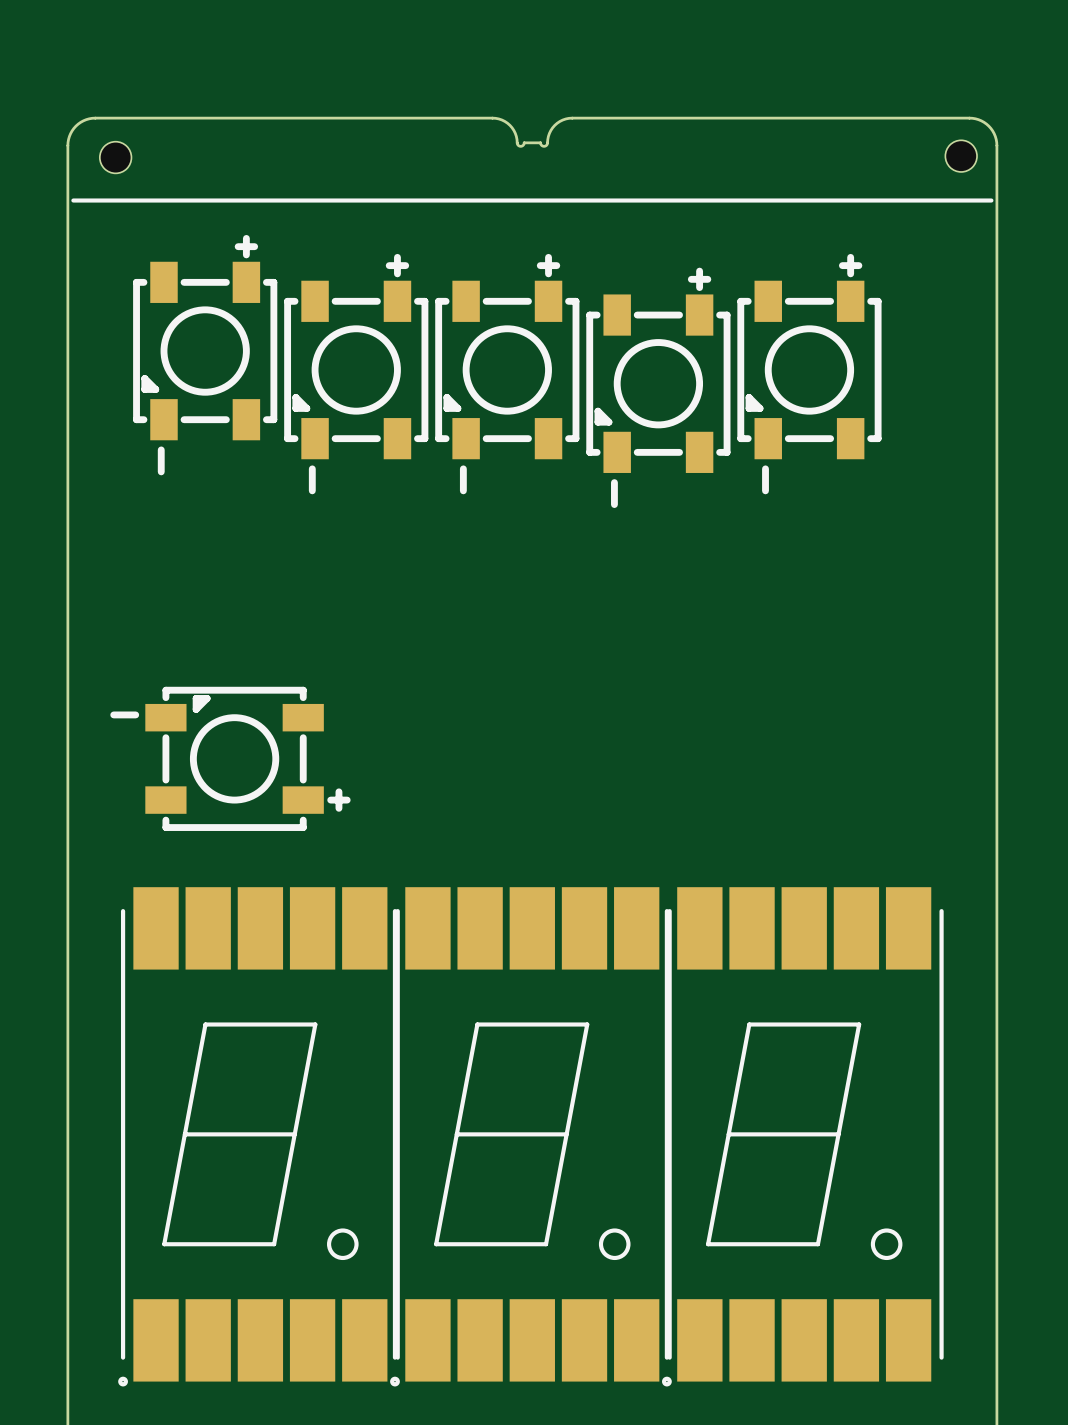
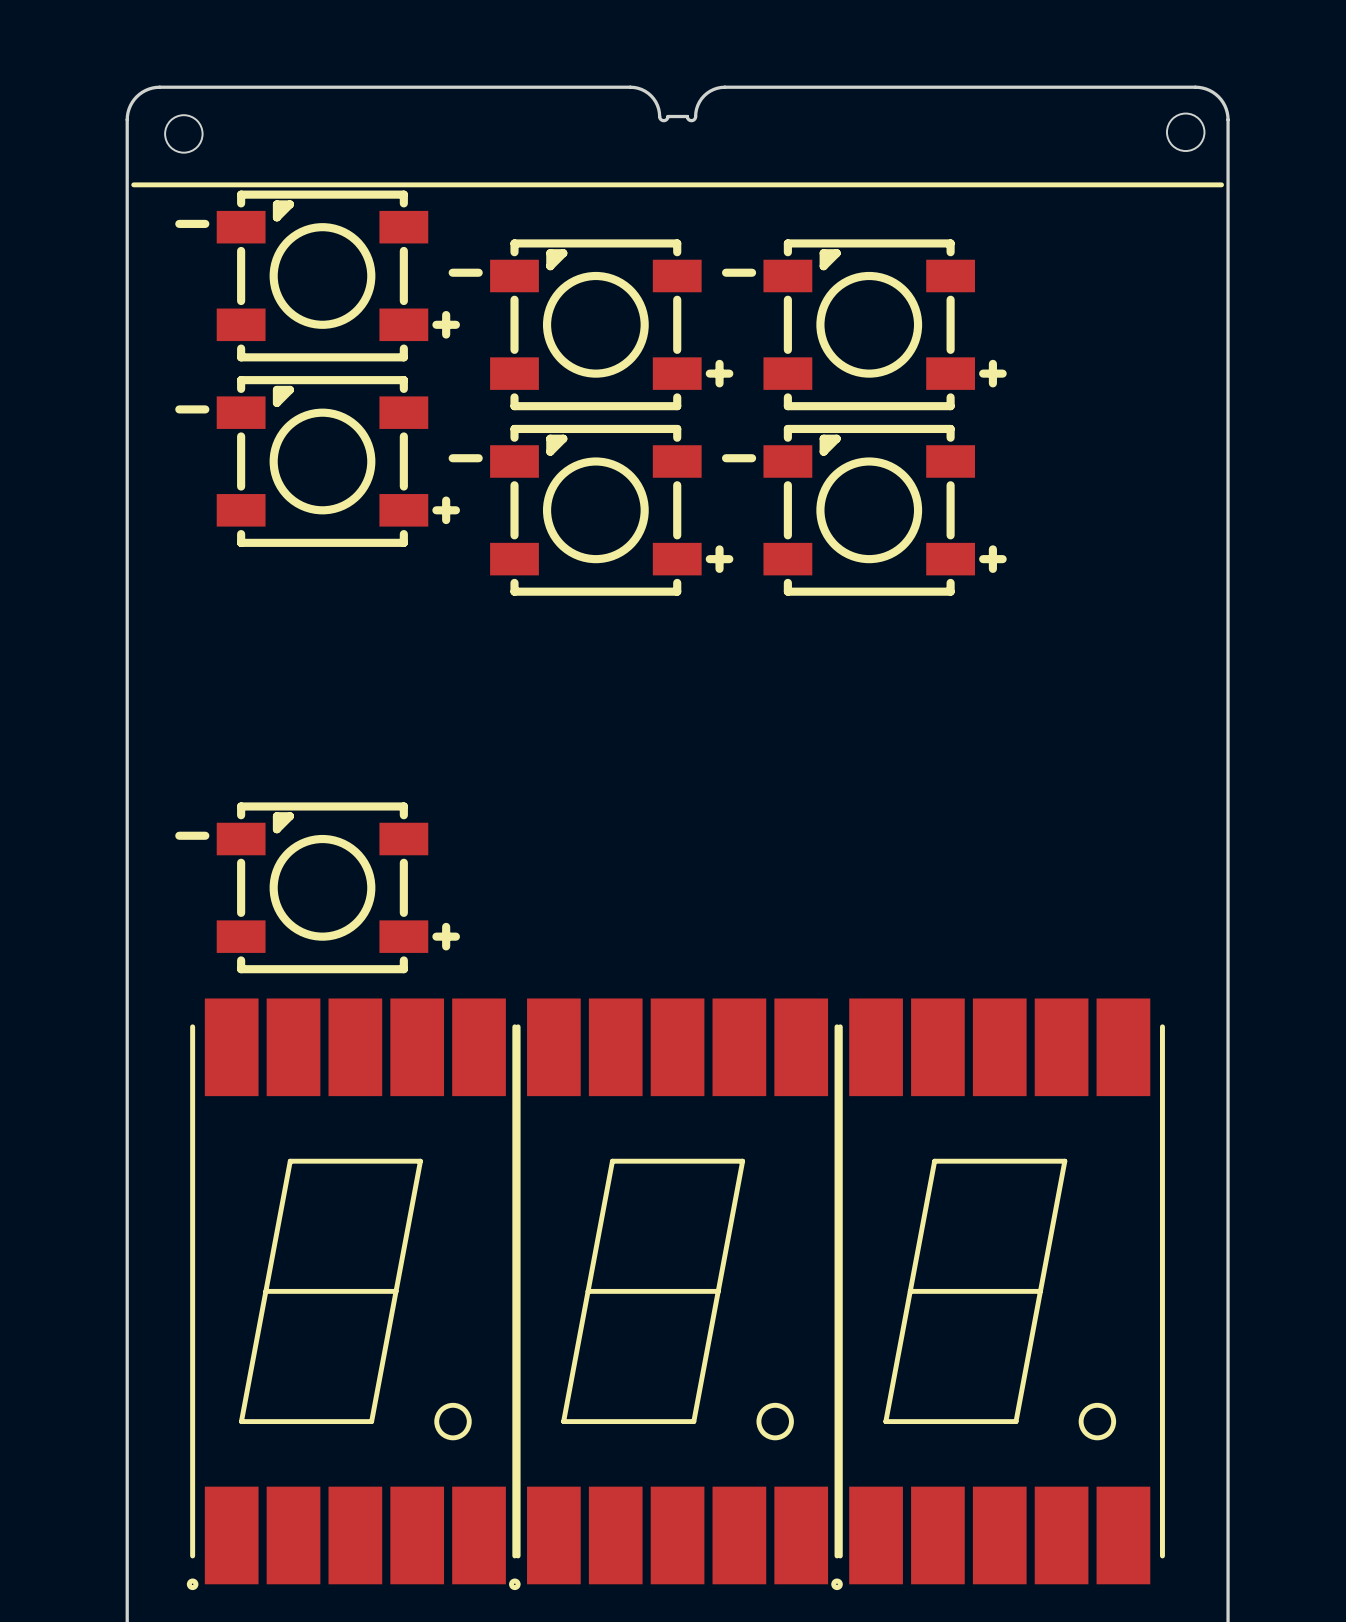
part: none -> (317, 275)
part: none -> (590, 324)
part: none -> (864, 324)
part: (205, 355) -> none
part: (356, 374) -> none
part: (507, 374) -> none
part: (809, 374) -> none
part: (658, 387) -> none
part: none -> (317, 461)
part: none -> (590, 510)
part: none -> (864, 510)
part position: (230, 758) -> (317, 887)

